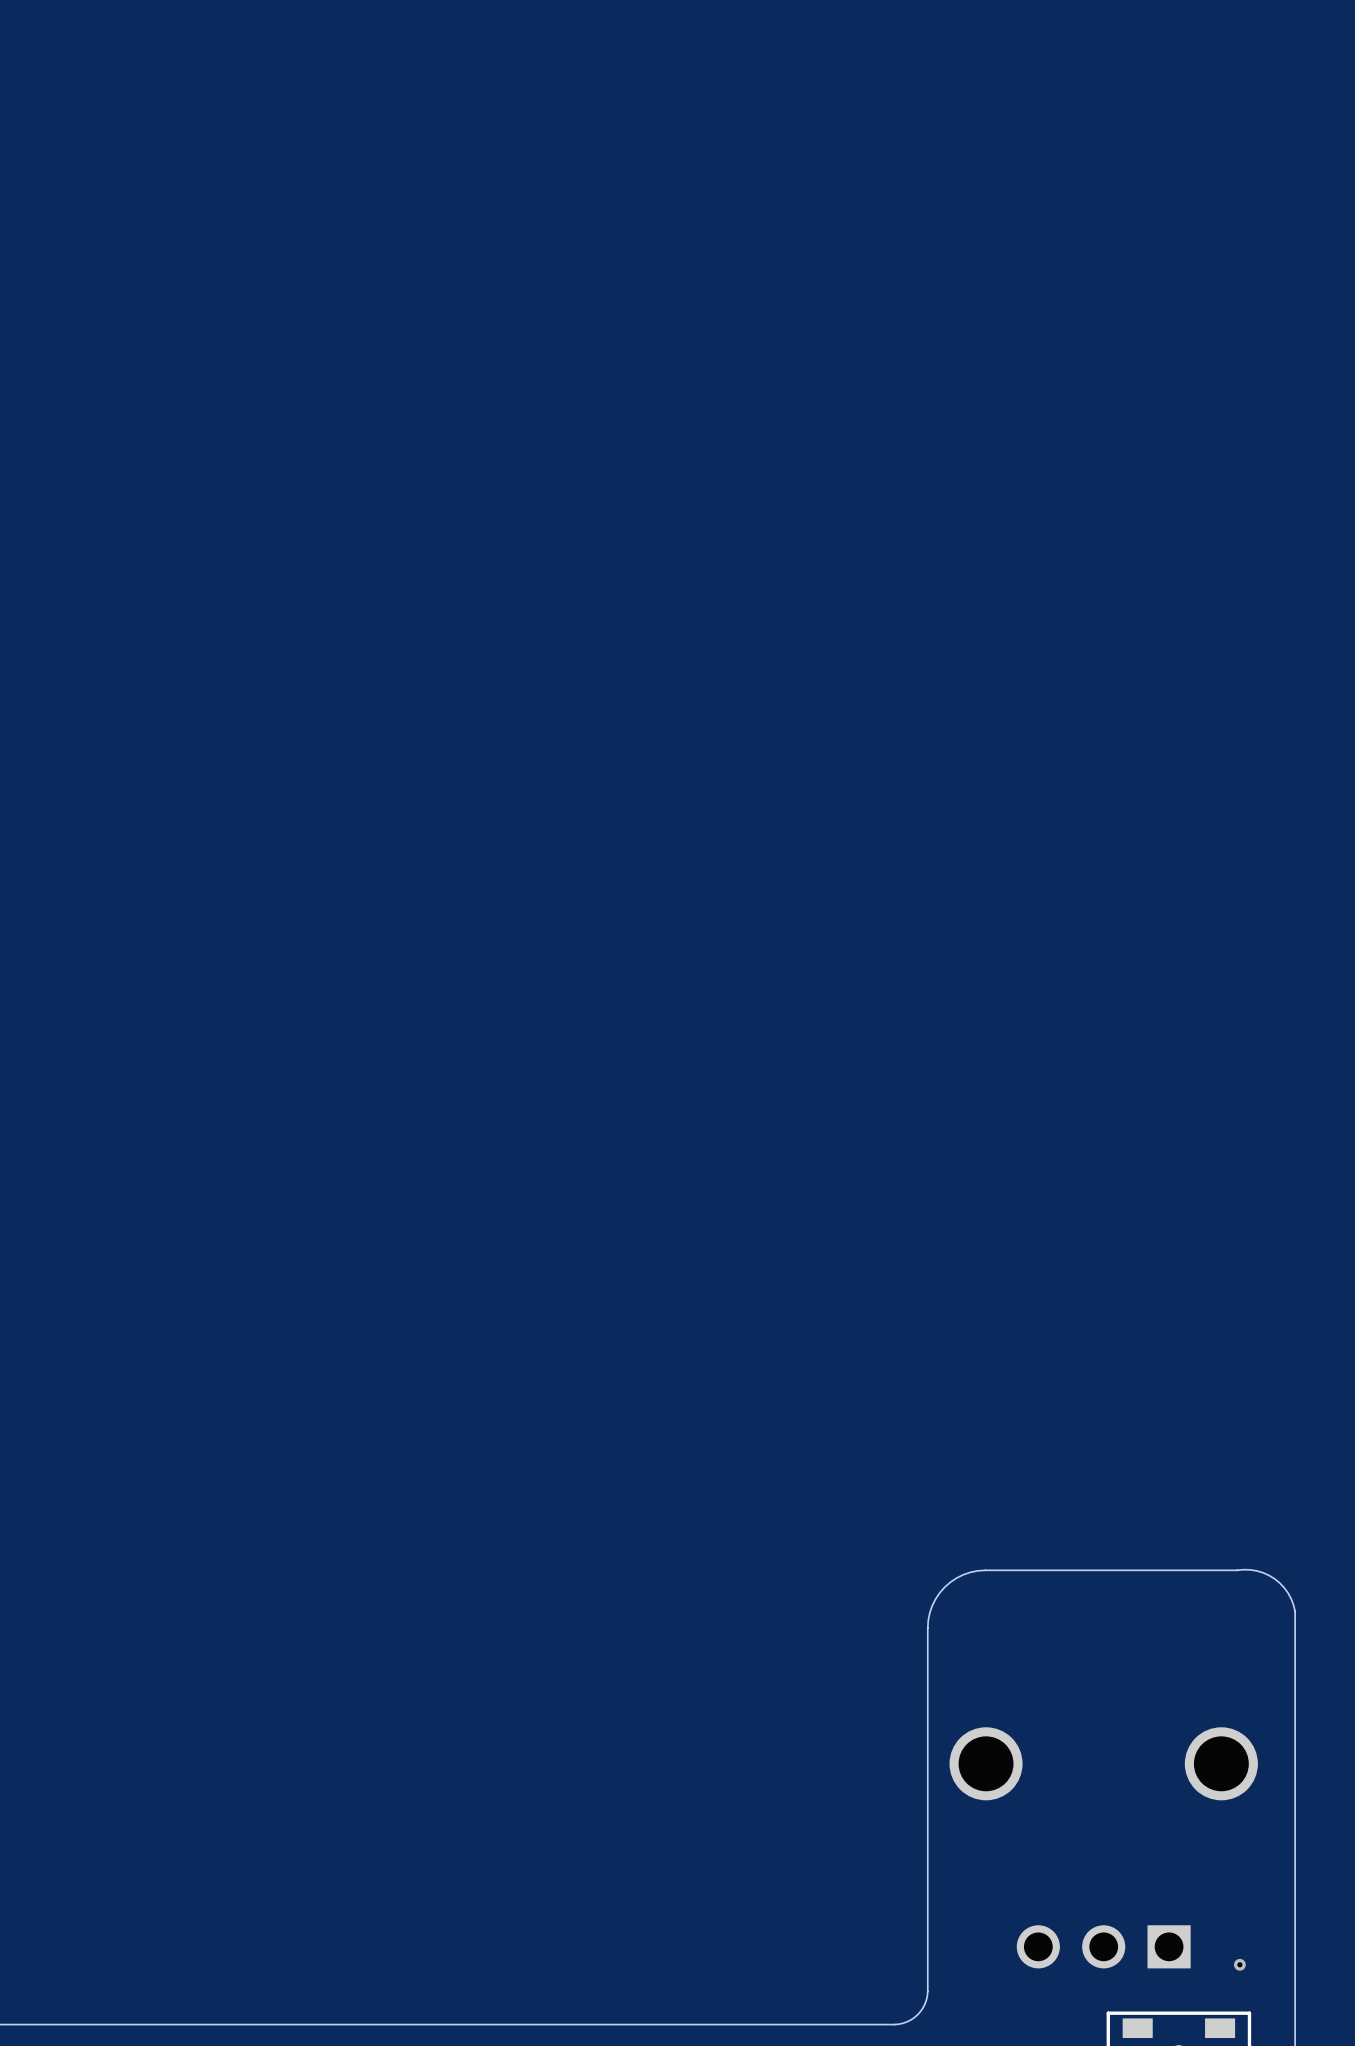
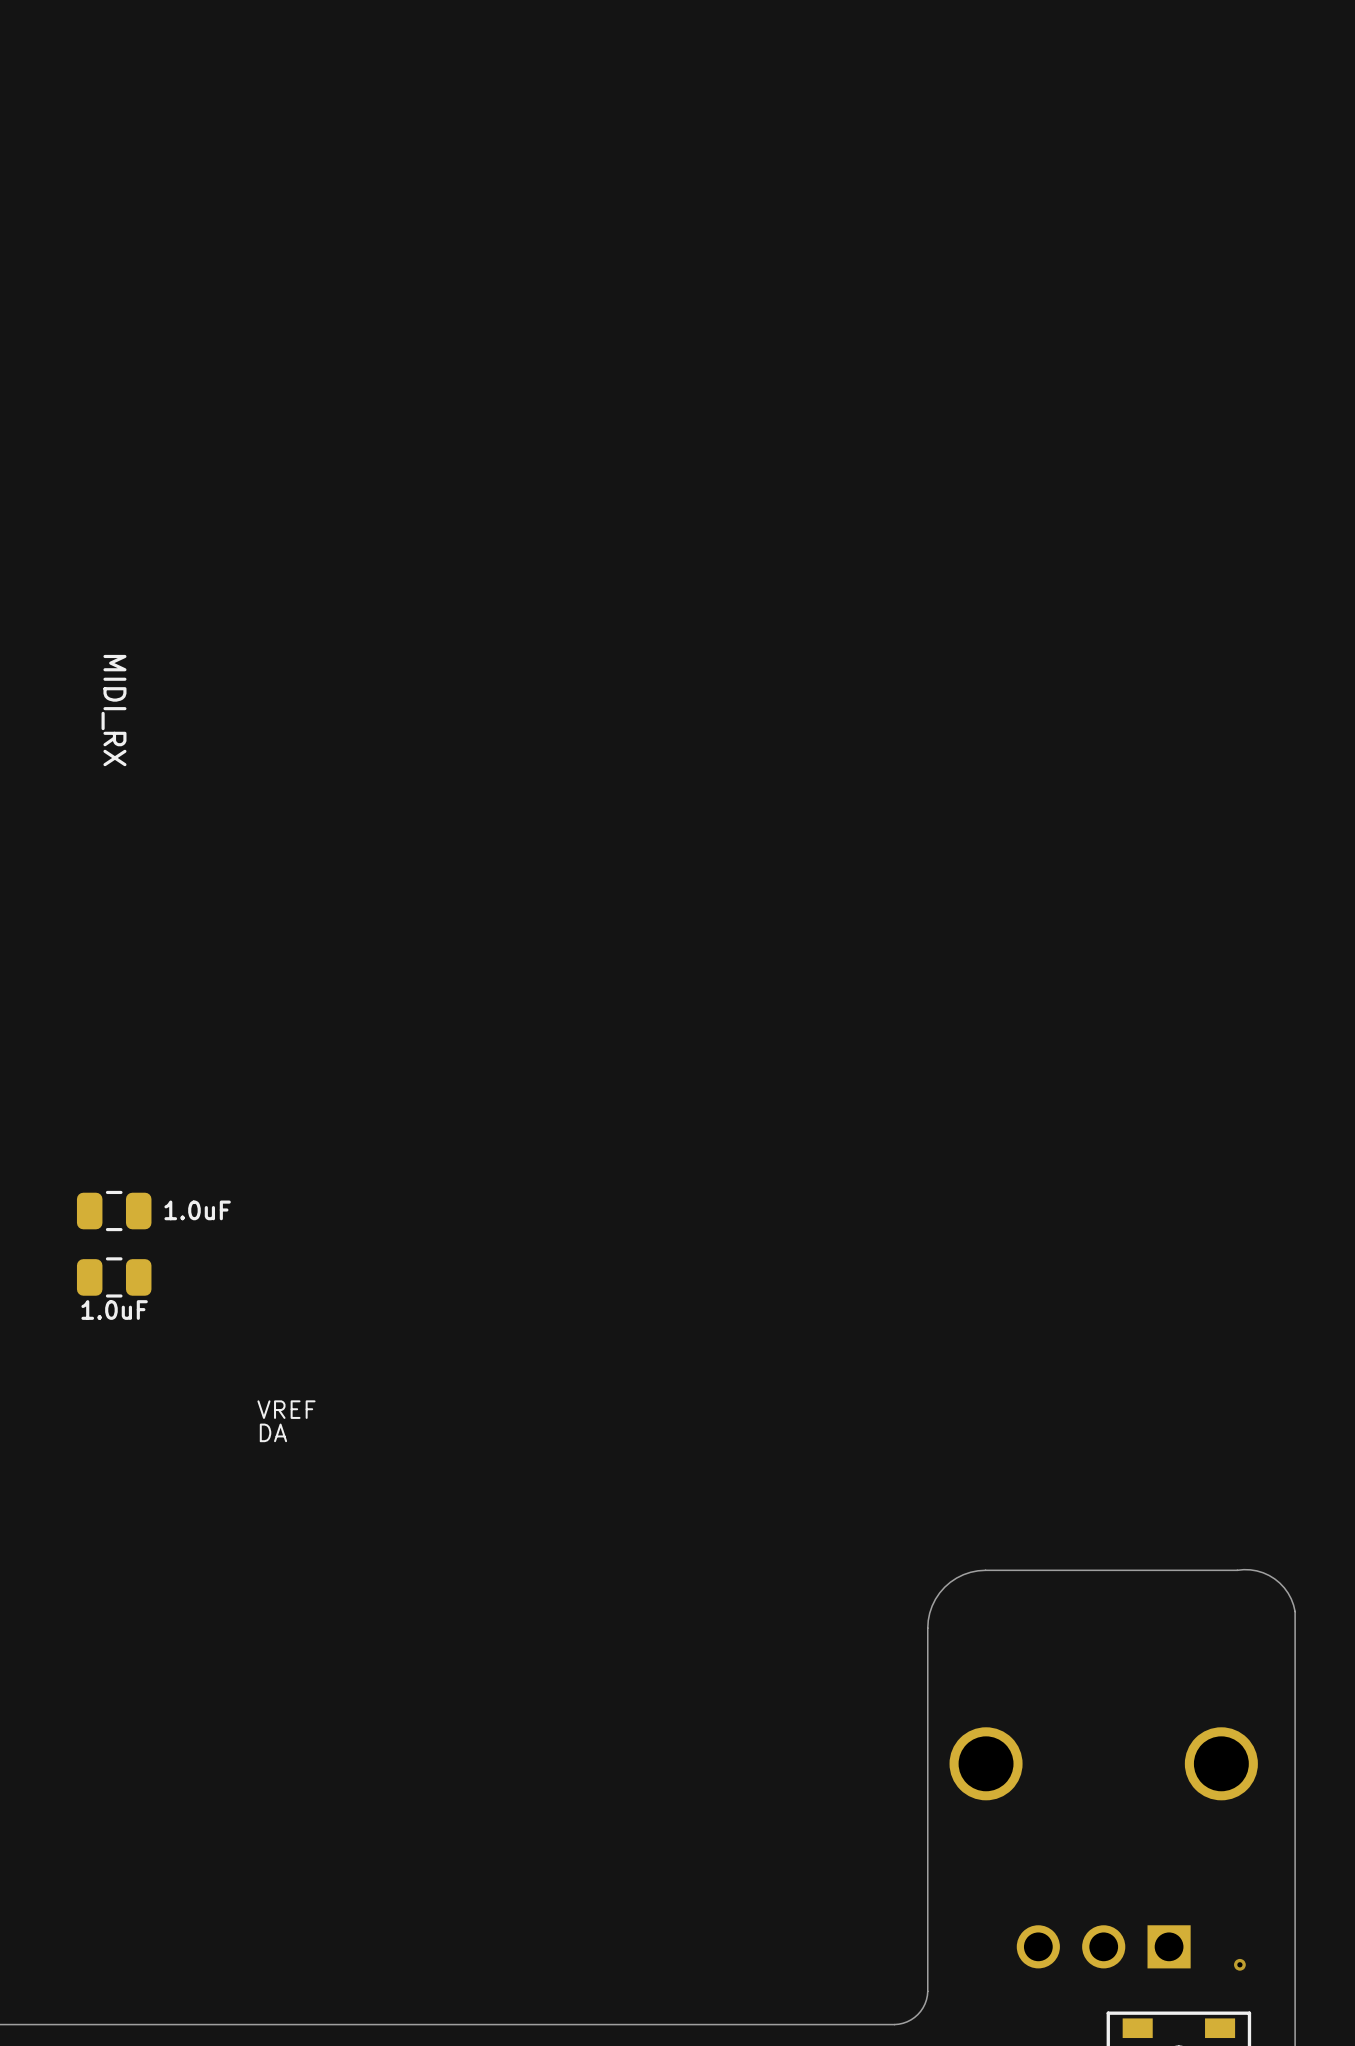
text: none -> MIDI_RX (114, 710)
part: none -> 1.0uF (114, 1211)
part: none -> 1.0uF (114, 1277)
text: none -> VREF (286, 1409)
text: none -> DA (273, 1432)

